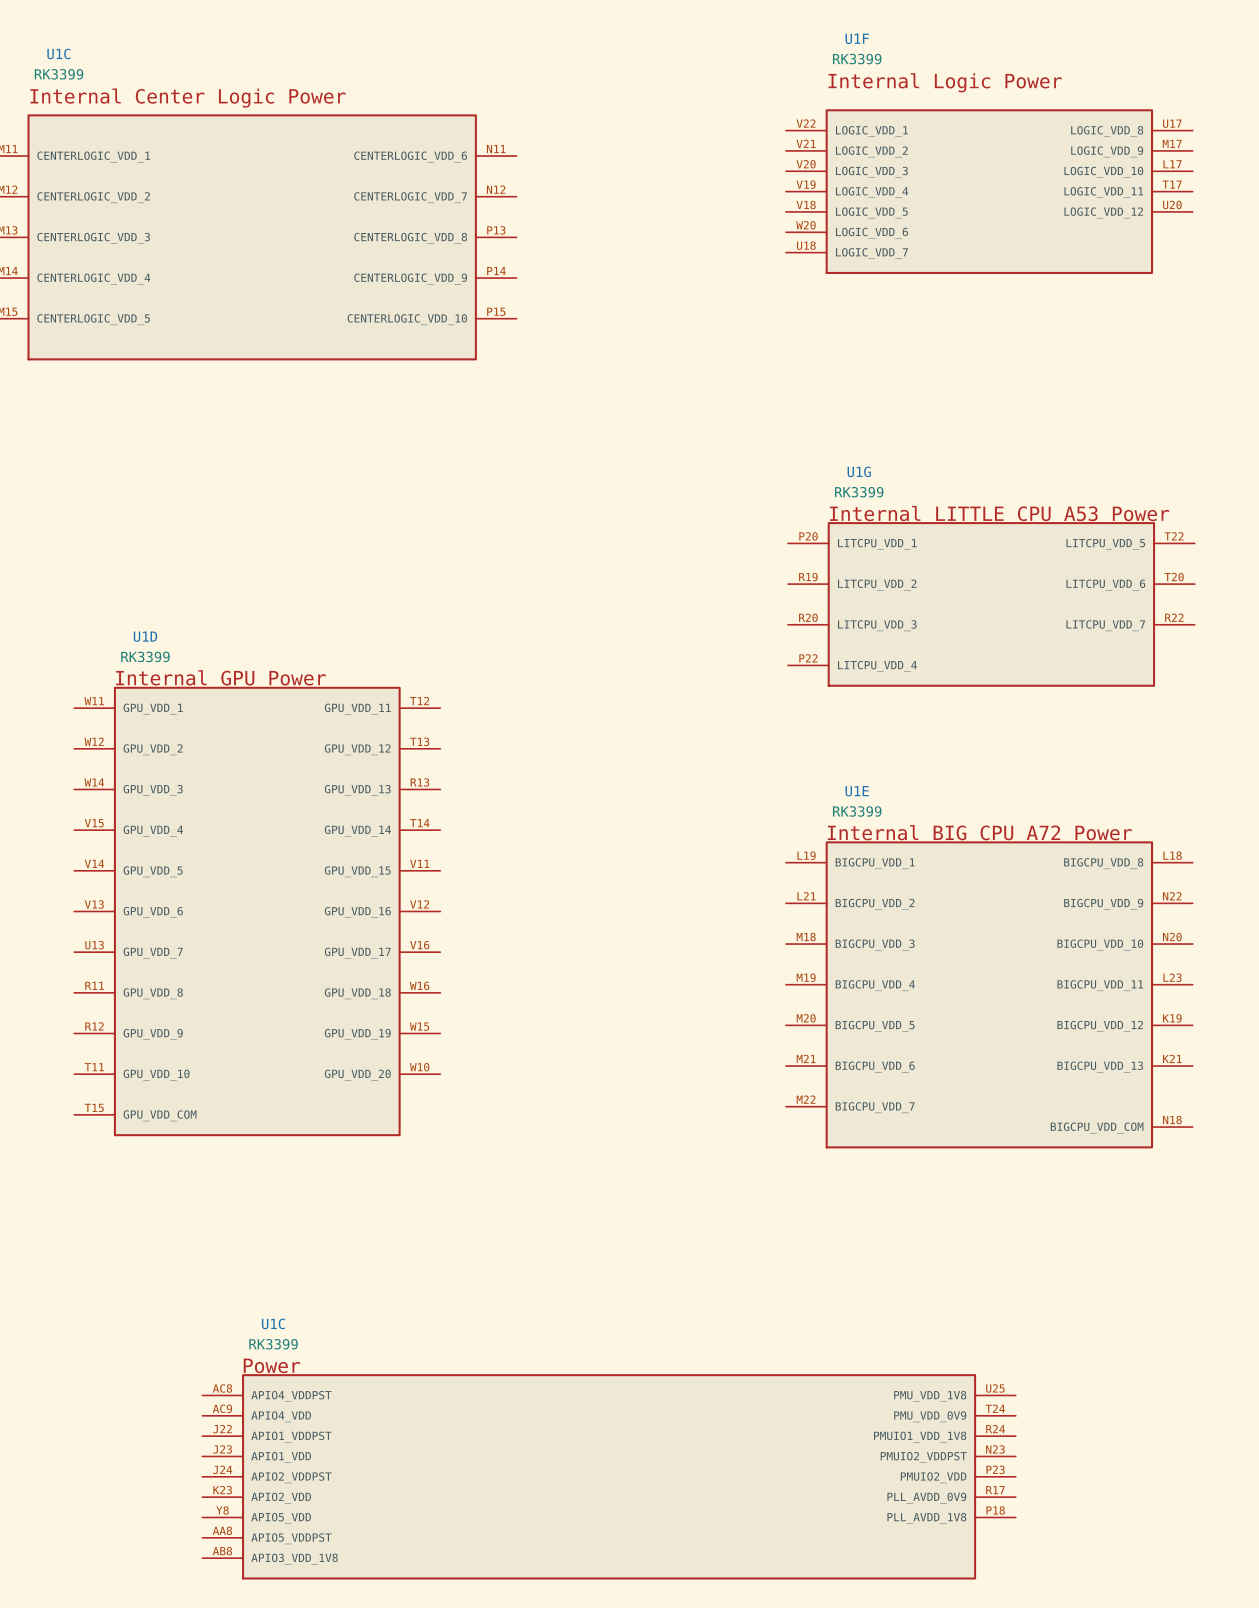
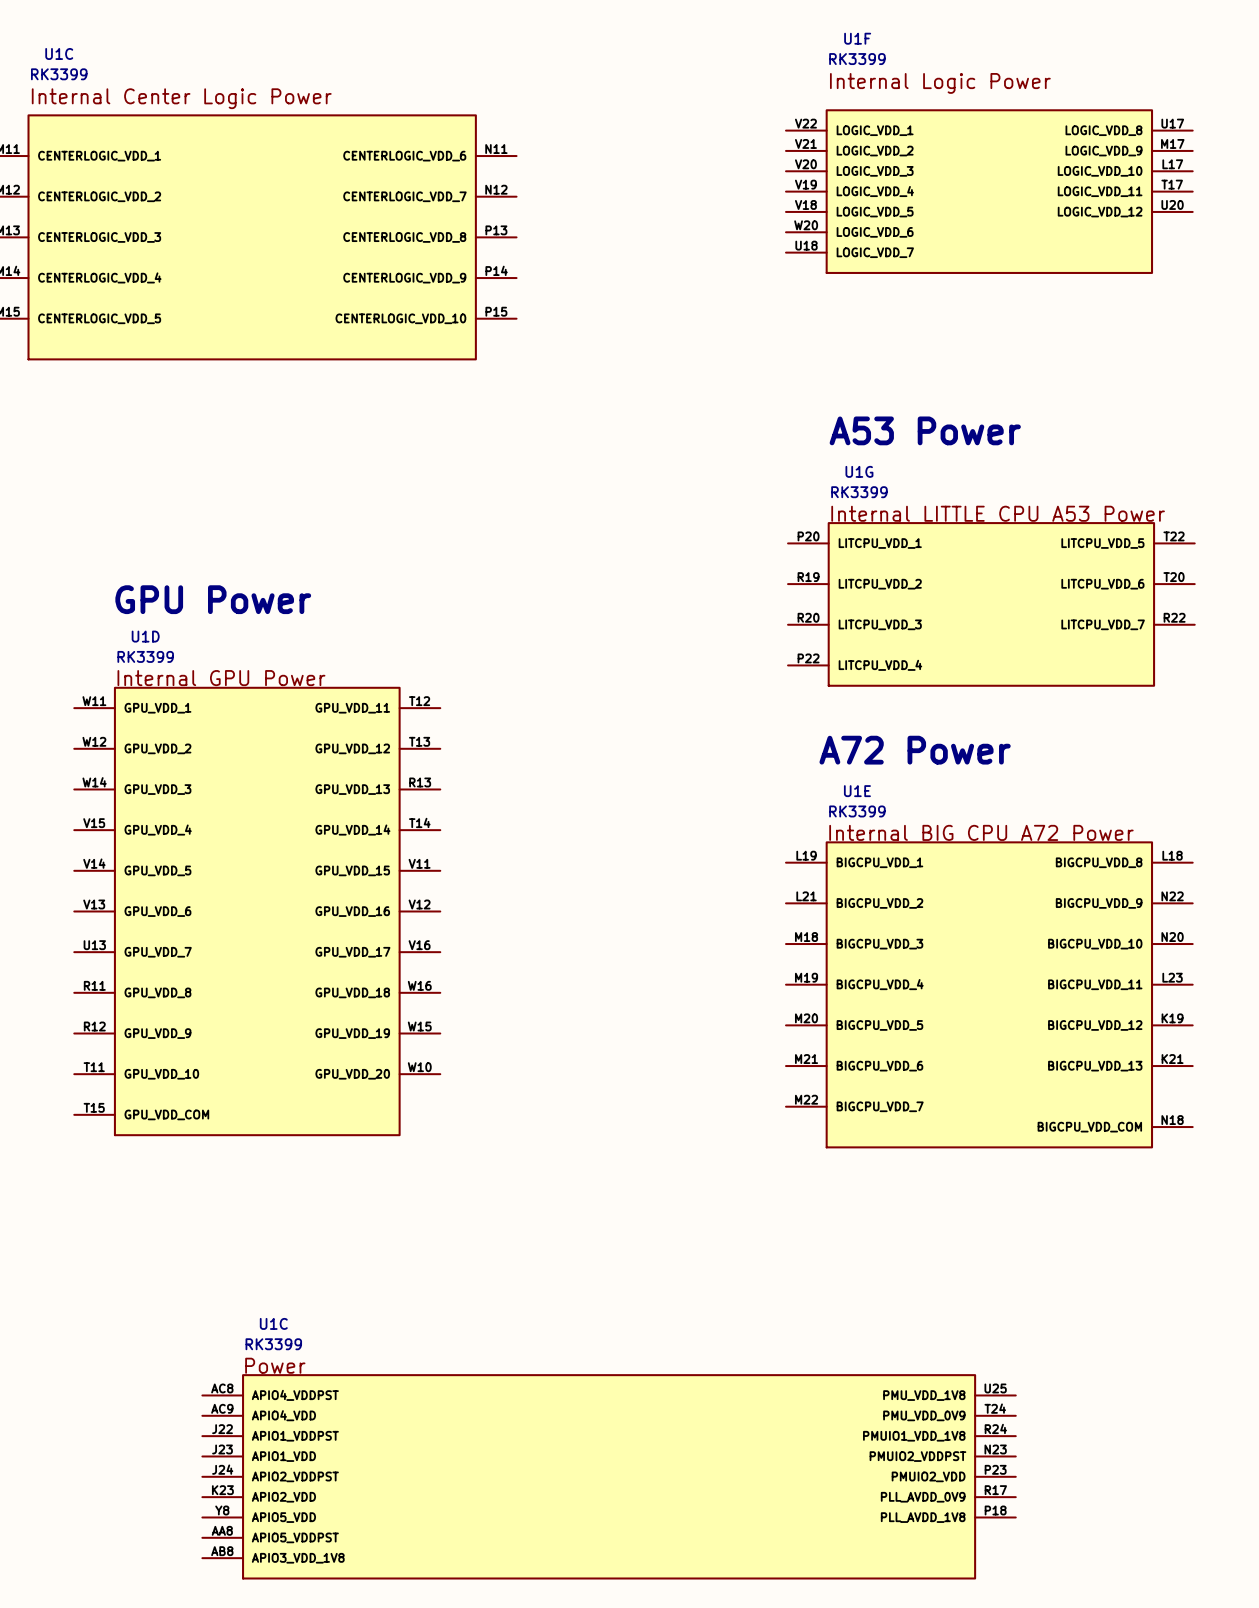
text: none -> A53 Power (925, 430)
text: none -> GPU Power (213, 599)
text: none -> A72 Power (915, 750)

